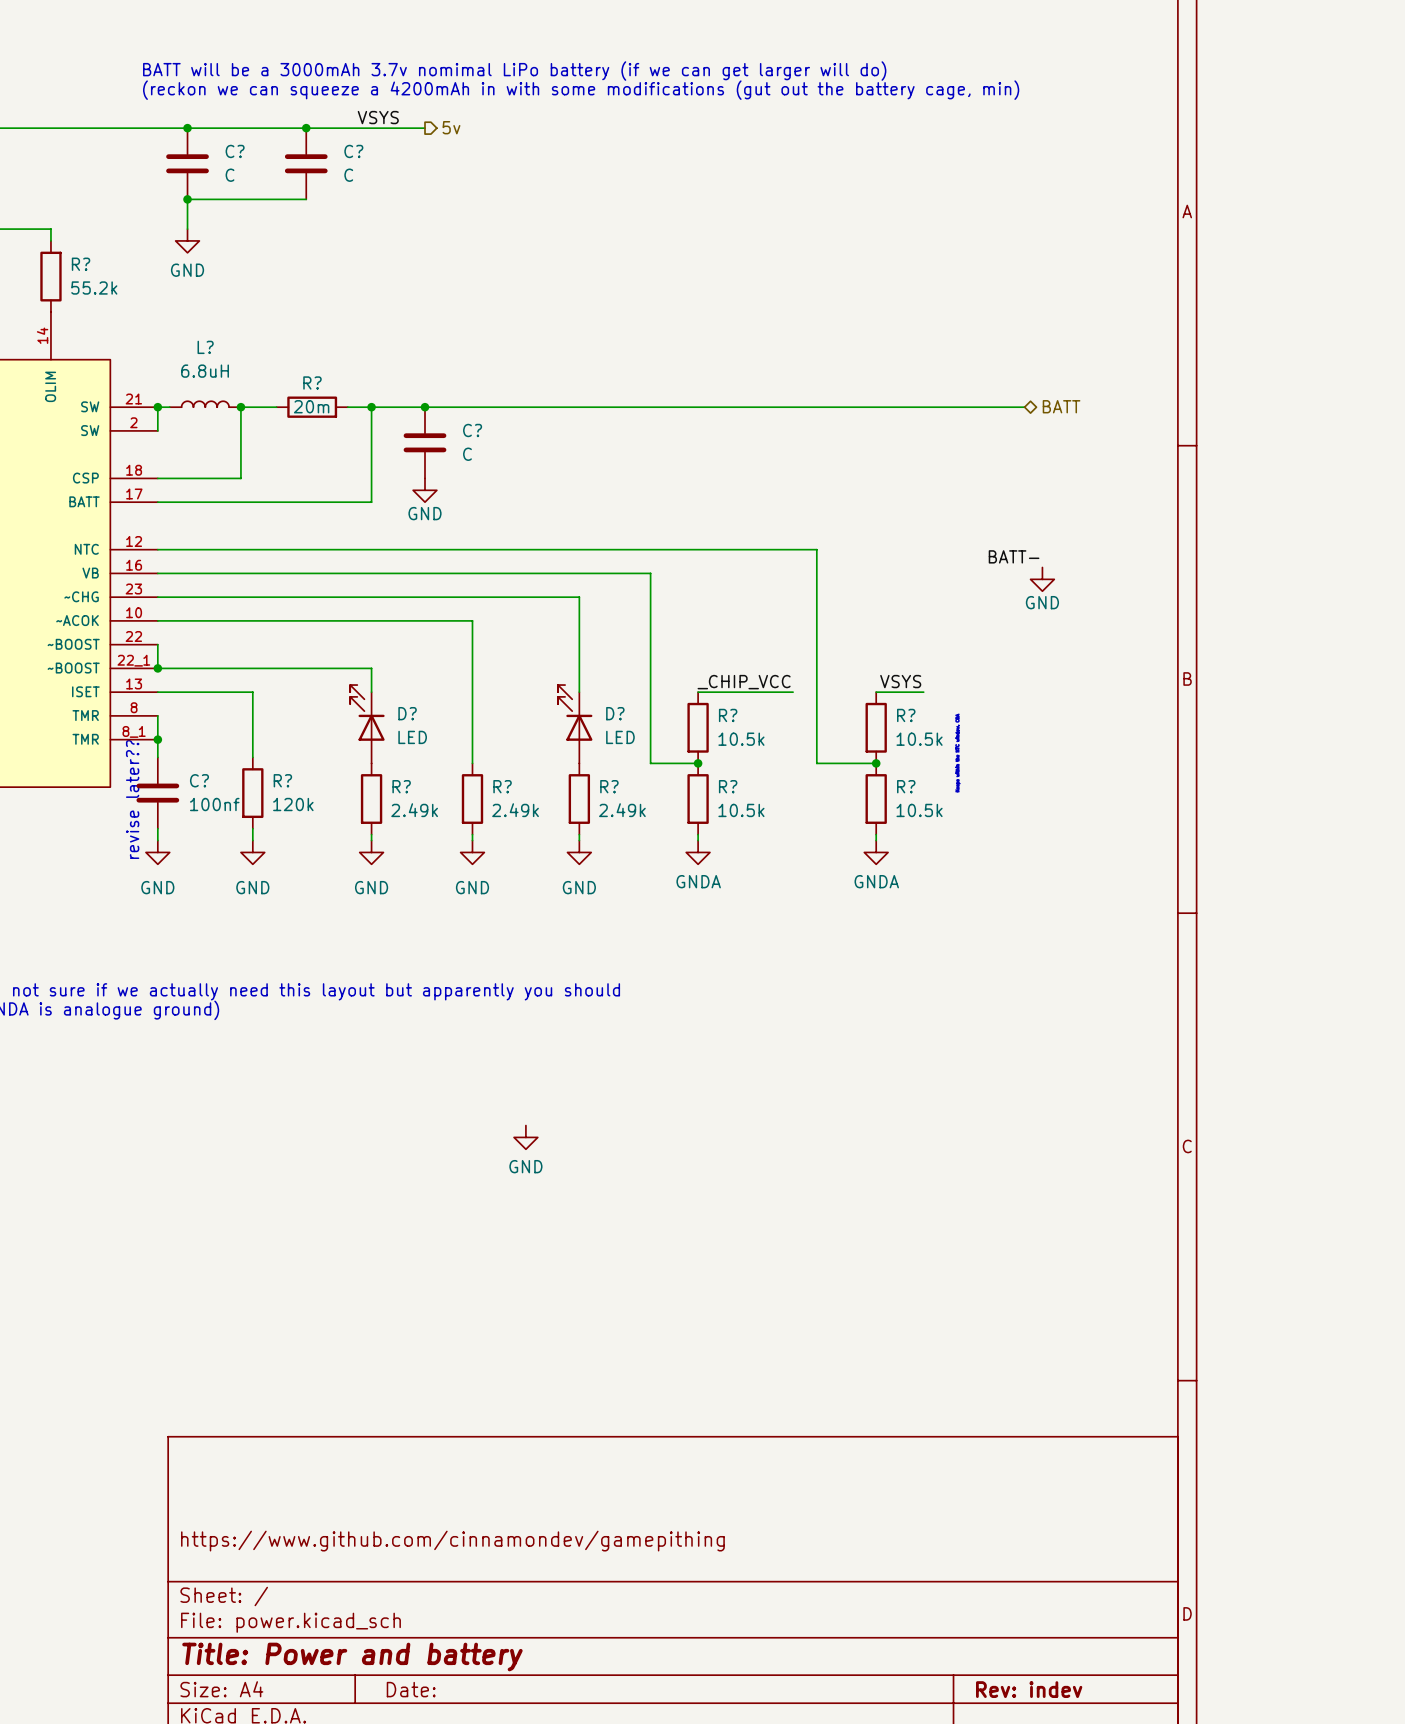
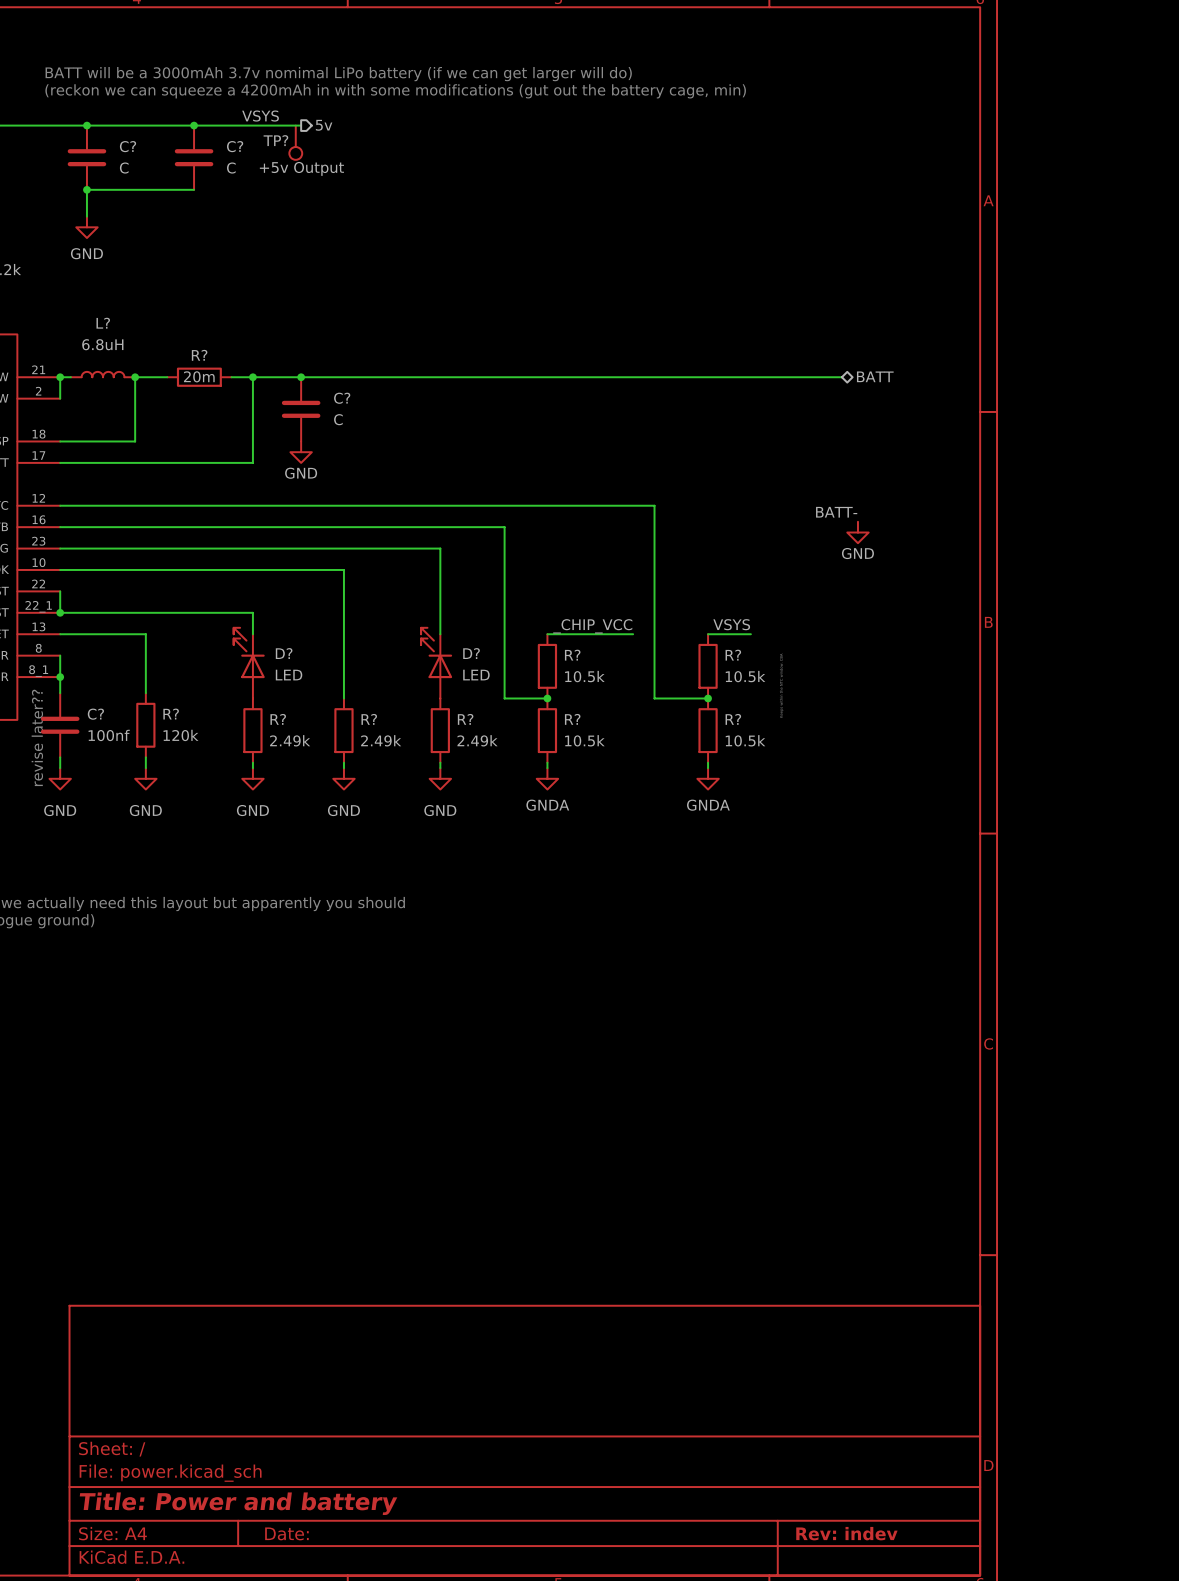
TP?: none -> +5v Output (295, 142)
power symbol: GND (525, 1137) -> none
title block: https://www.github.com/cinnamondev/gamepithing (452, 1541) -> none

